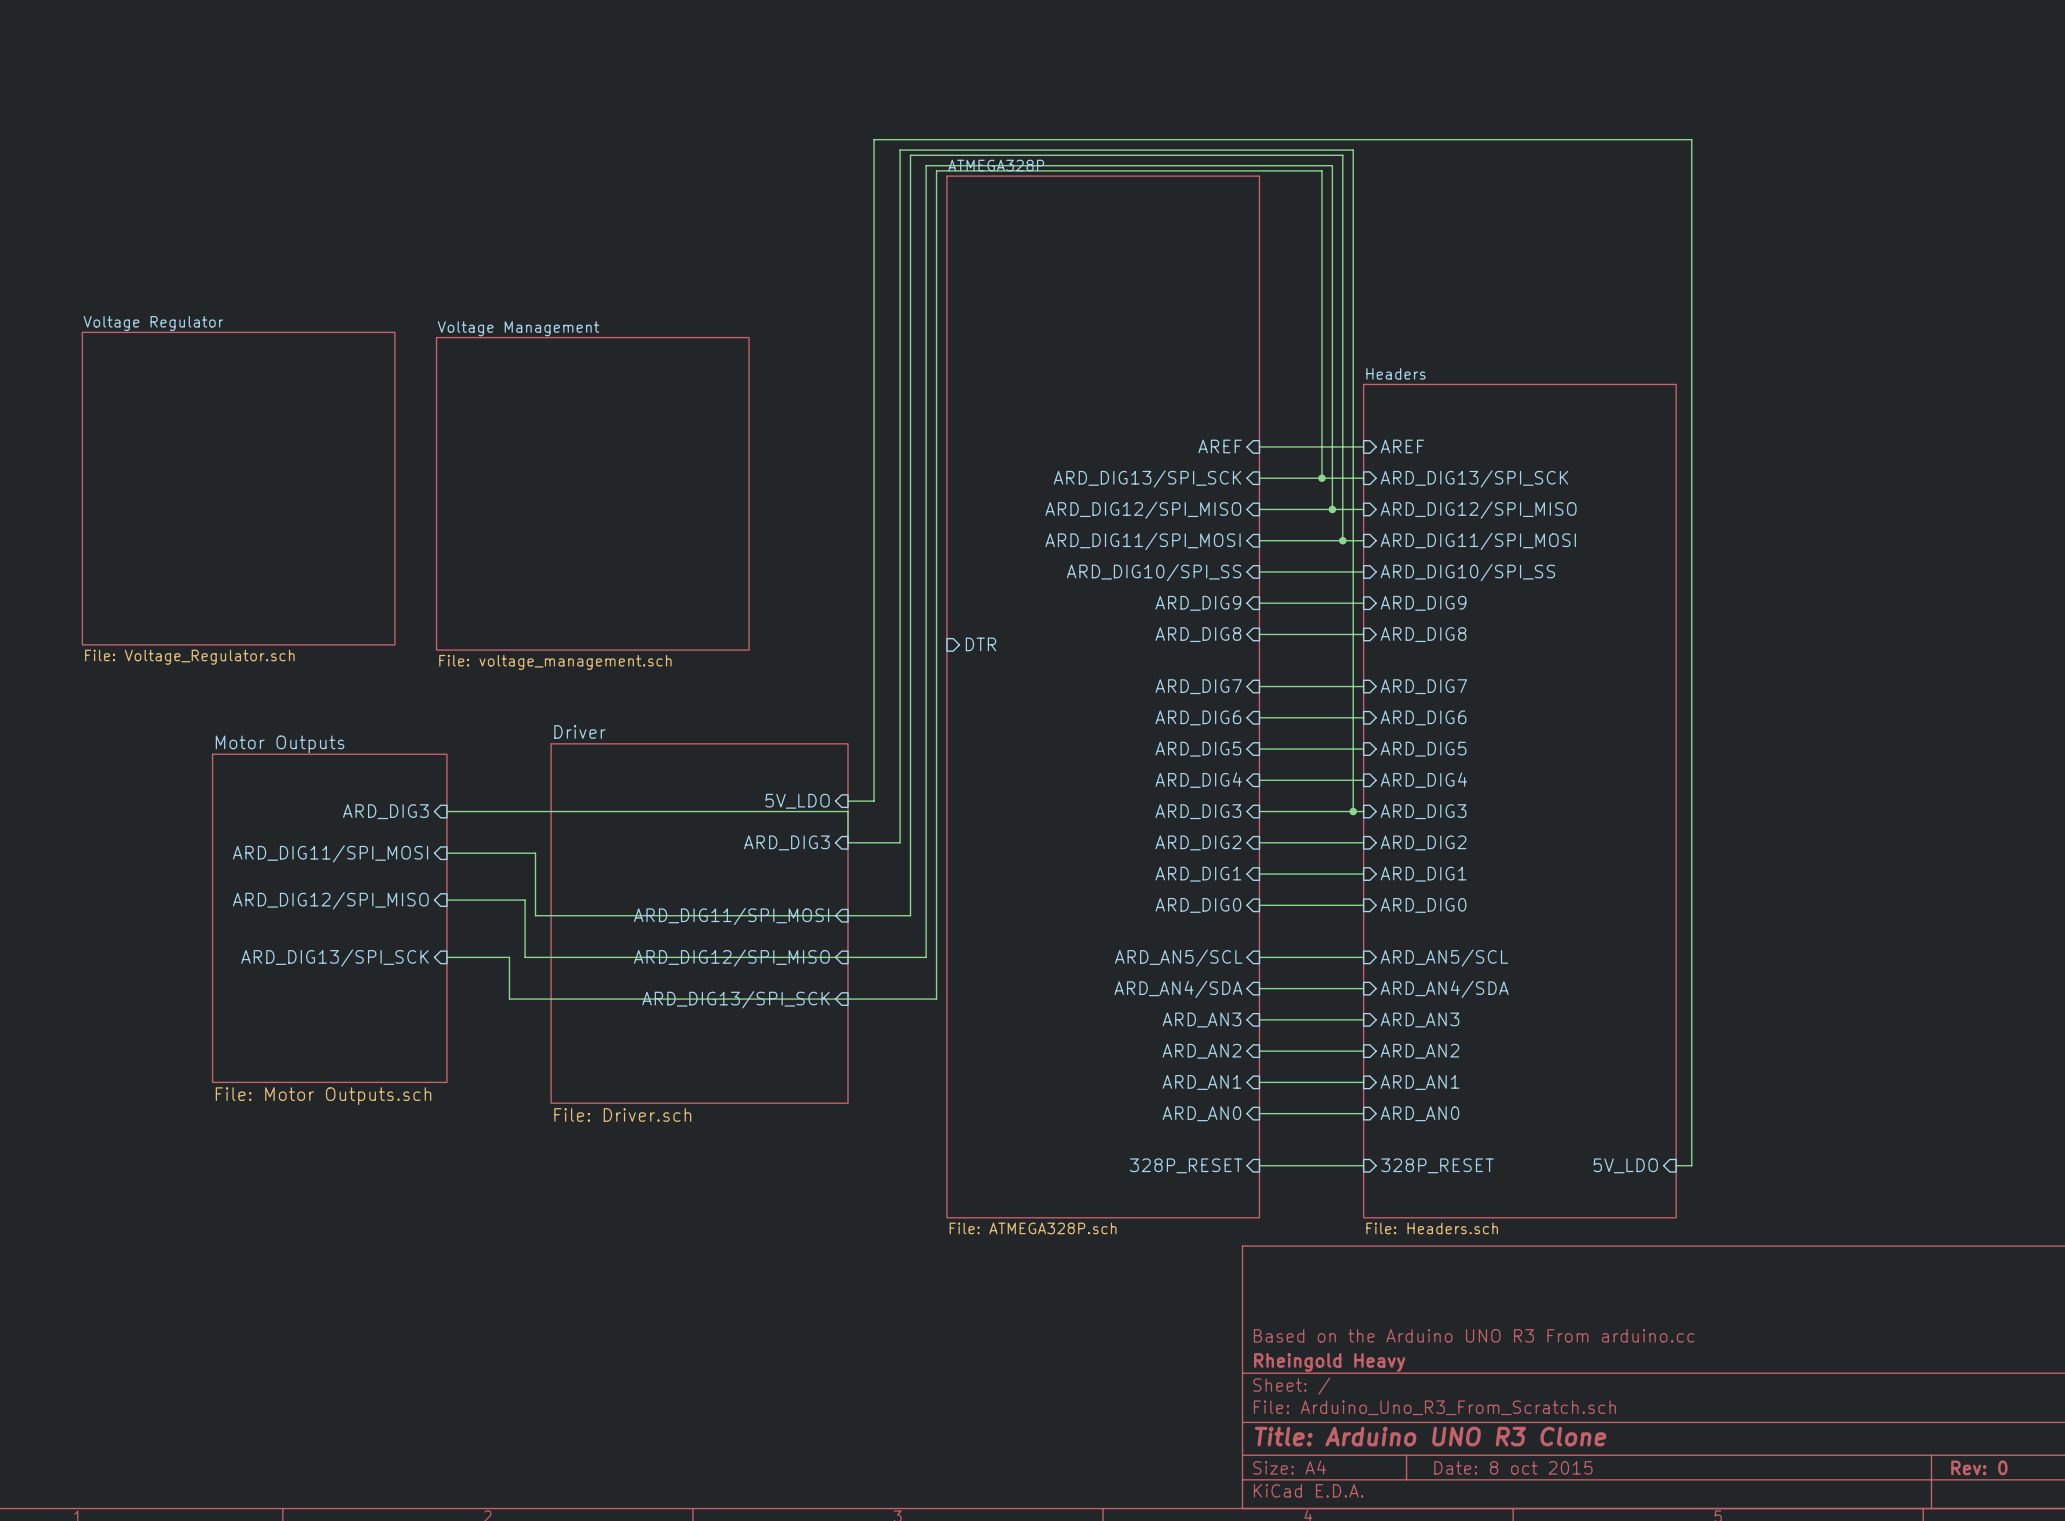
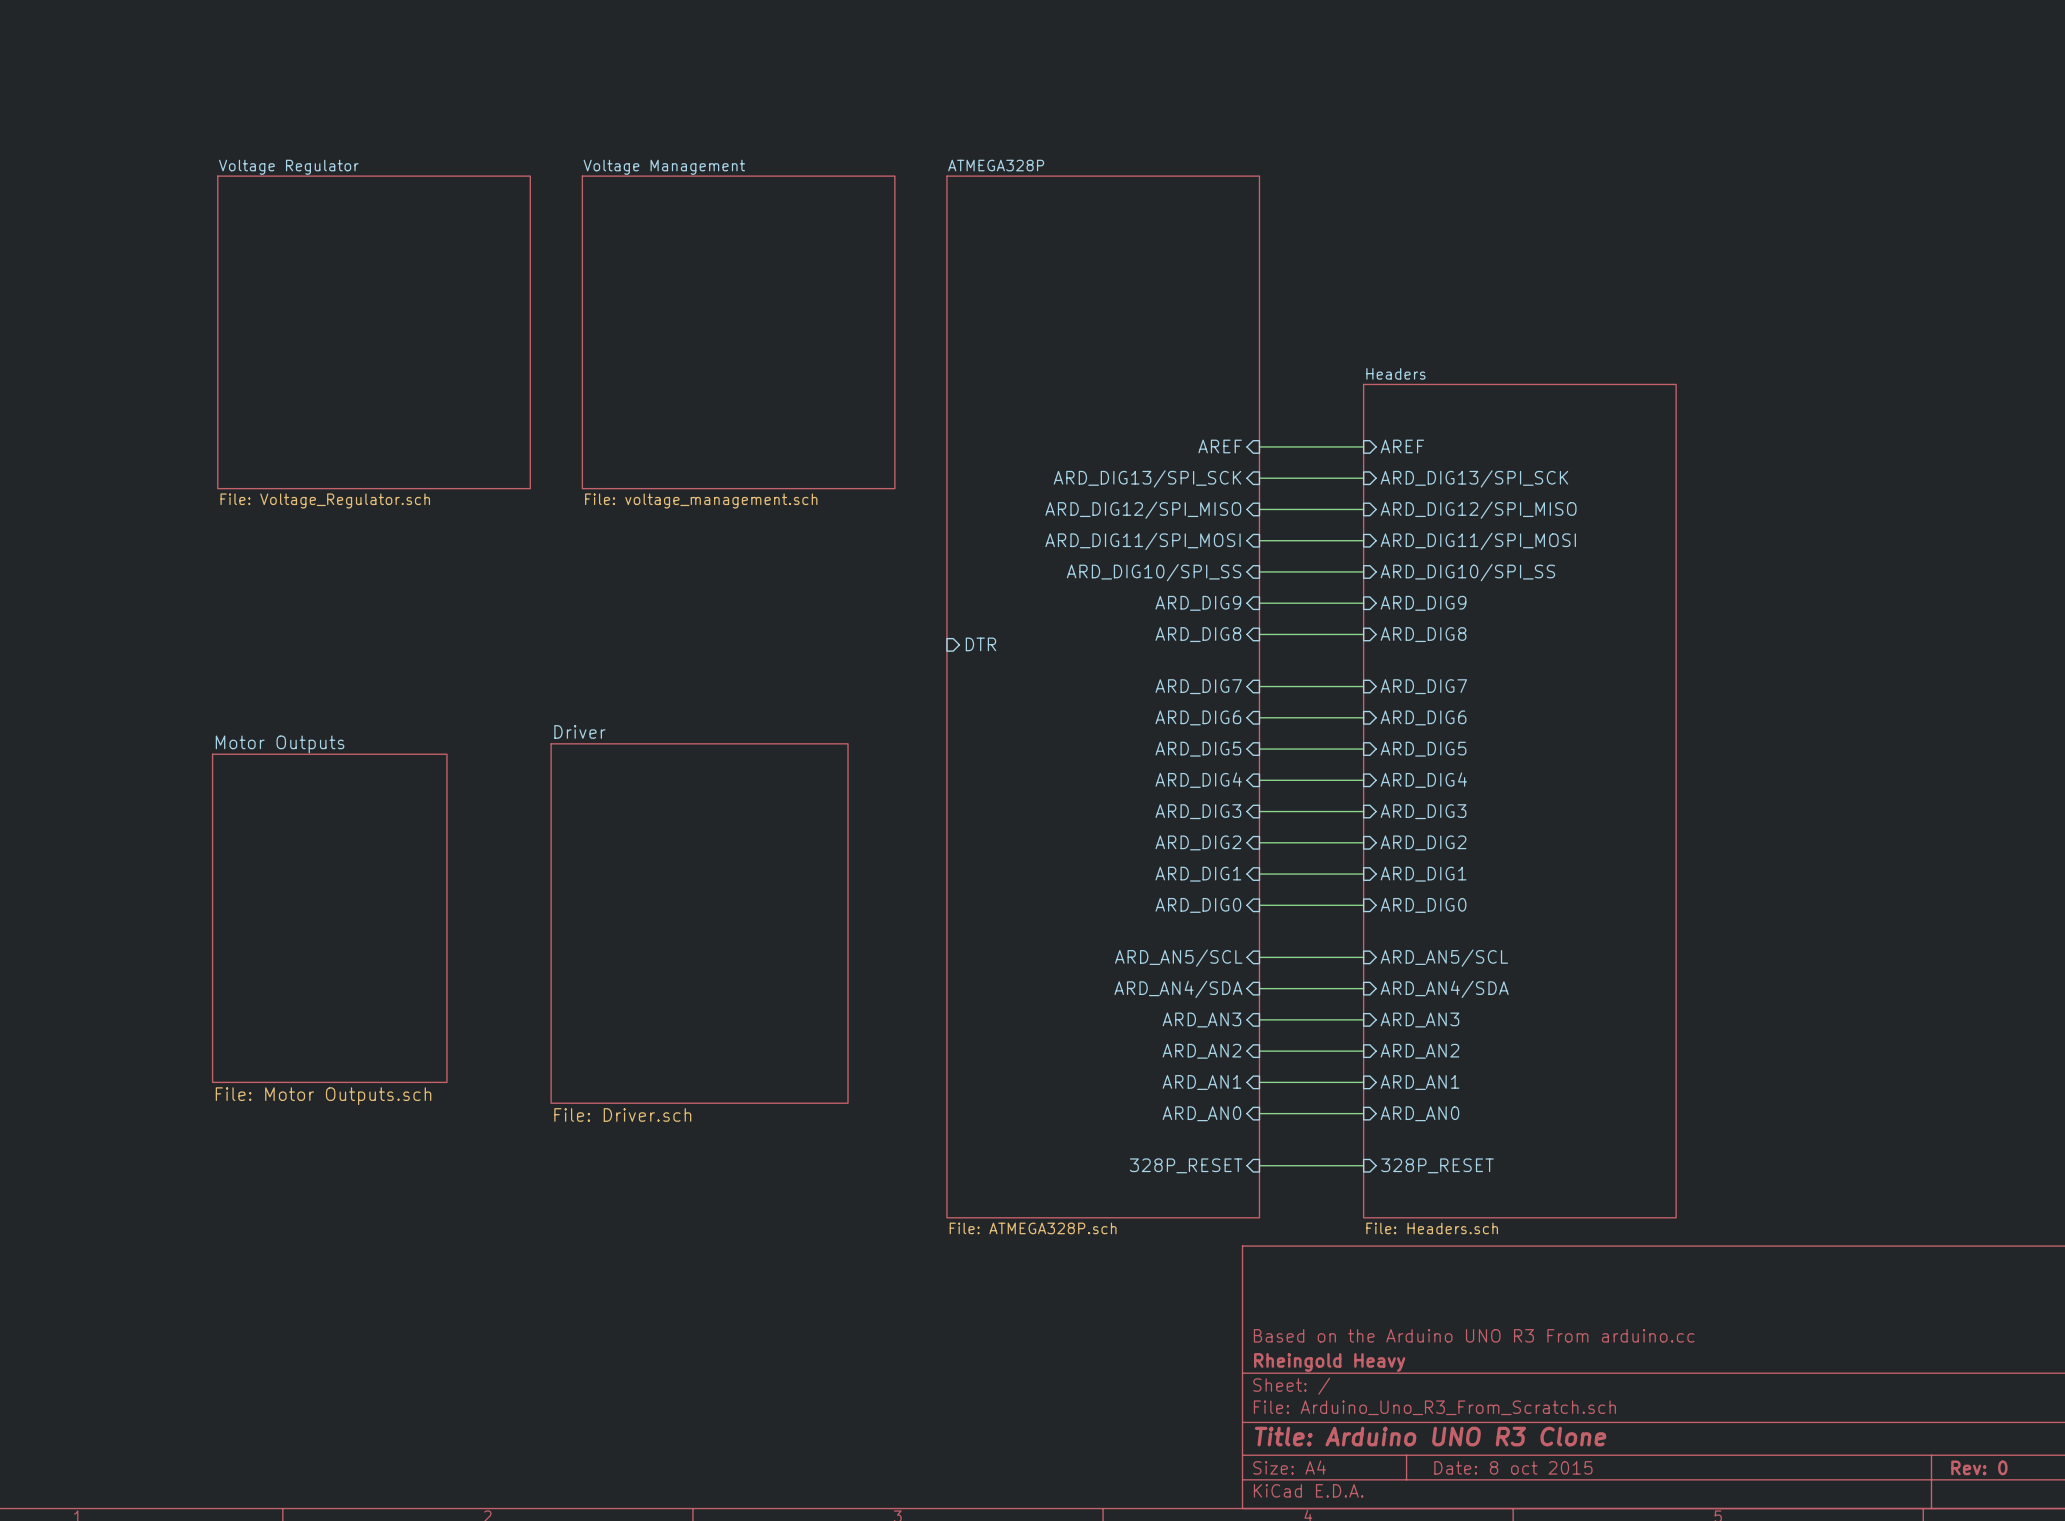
sheet Voltage Regulator: none -> File: Voltage_Regulator.sch (374, 332)
sheet Voltage Management: none -> File: voltage_management.sch (738, 332)
wire: (1321, 478) (1321, 170) (936, 170) (936, 999) (509, 999) (509, 957) (446, 957) -> none
junction: (1321, 478) -> none
sheet Voltage Regulator: File: Voltage_Regulator.sch (238, 488) -> none
sheet Voltage Management: File: voltage_management.sch (592, 493) -> none
wire: (1332, 509) (1332, 165) (926, 165) (926, 957) (525, 957) (525, 900) (446, 900) -> none
junction: (1332, 509) -> none
wire: (1342, 540) (1342, 155) (910, 155) (910, 915) (535, 915) (535, 853) (446, 853) -> none
junction: (1342, 540) -> none
sheet pin: 5V_LDO (797, 801) -> none
wire: (848, 801) (874, 801) (874, 139) (1691, 139) (1691, 1165) (1676, 1165) -> none
sheet pin: ARD_DIG3 (385, 811) -> none
wire: (446, 811) (848, 811) (848, 842) (900, 842) (900, 150) (1353, 150) (1353, 811) -> none
junction: (1353, 811) -> none
sheet pin: ARD_DIG3 (786, 842) -> none
sheet pin: ARD_DIG11/SPI_MOSI (330, 853) -> none
sheet pin: ARD_DIG12/SPI_MISO (330, 900) -> none
sheet pin: ARD_DIG11/SPI_MOSI (731, 916) -> none
sheet pin: ARD_DIG13/SPI_SCK (334, 958) -> none
sheet pin: ARD_DIG12/SPI_MISO (731, 958) -> none
sheet pin: ARD_DIG13/SPI_SCK (736, 999) -> none
sheet pin: 5V_LDO (1625, 1165) -> none

